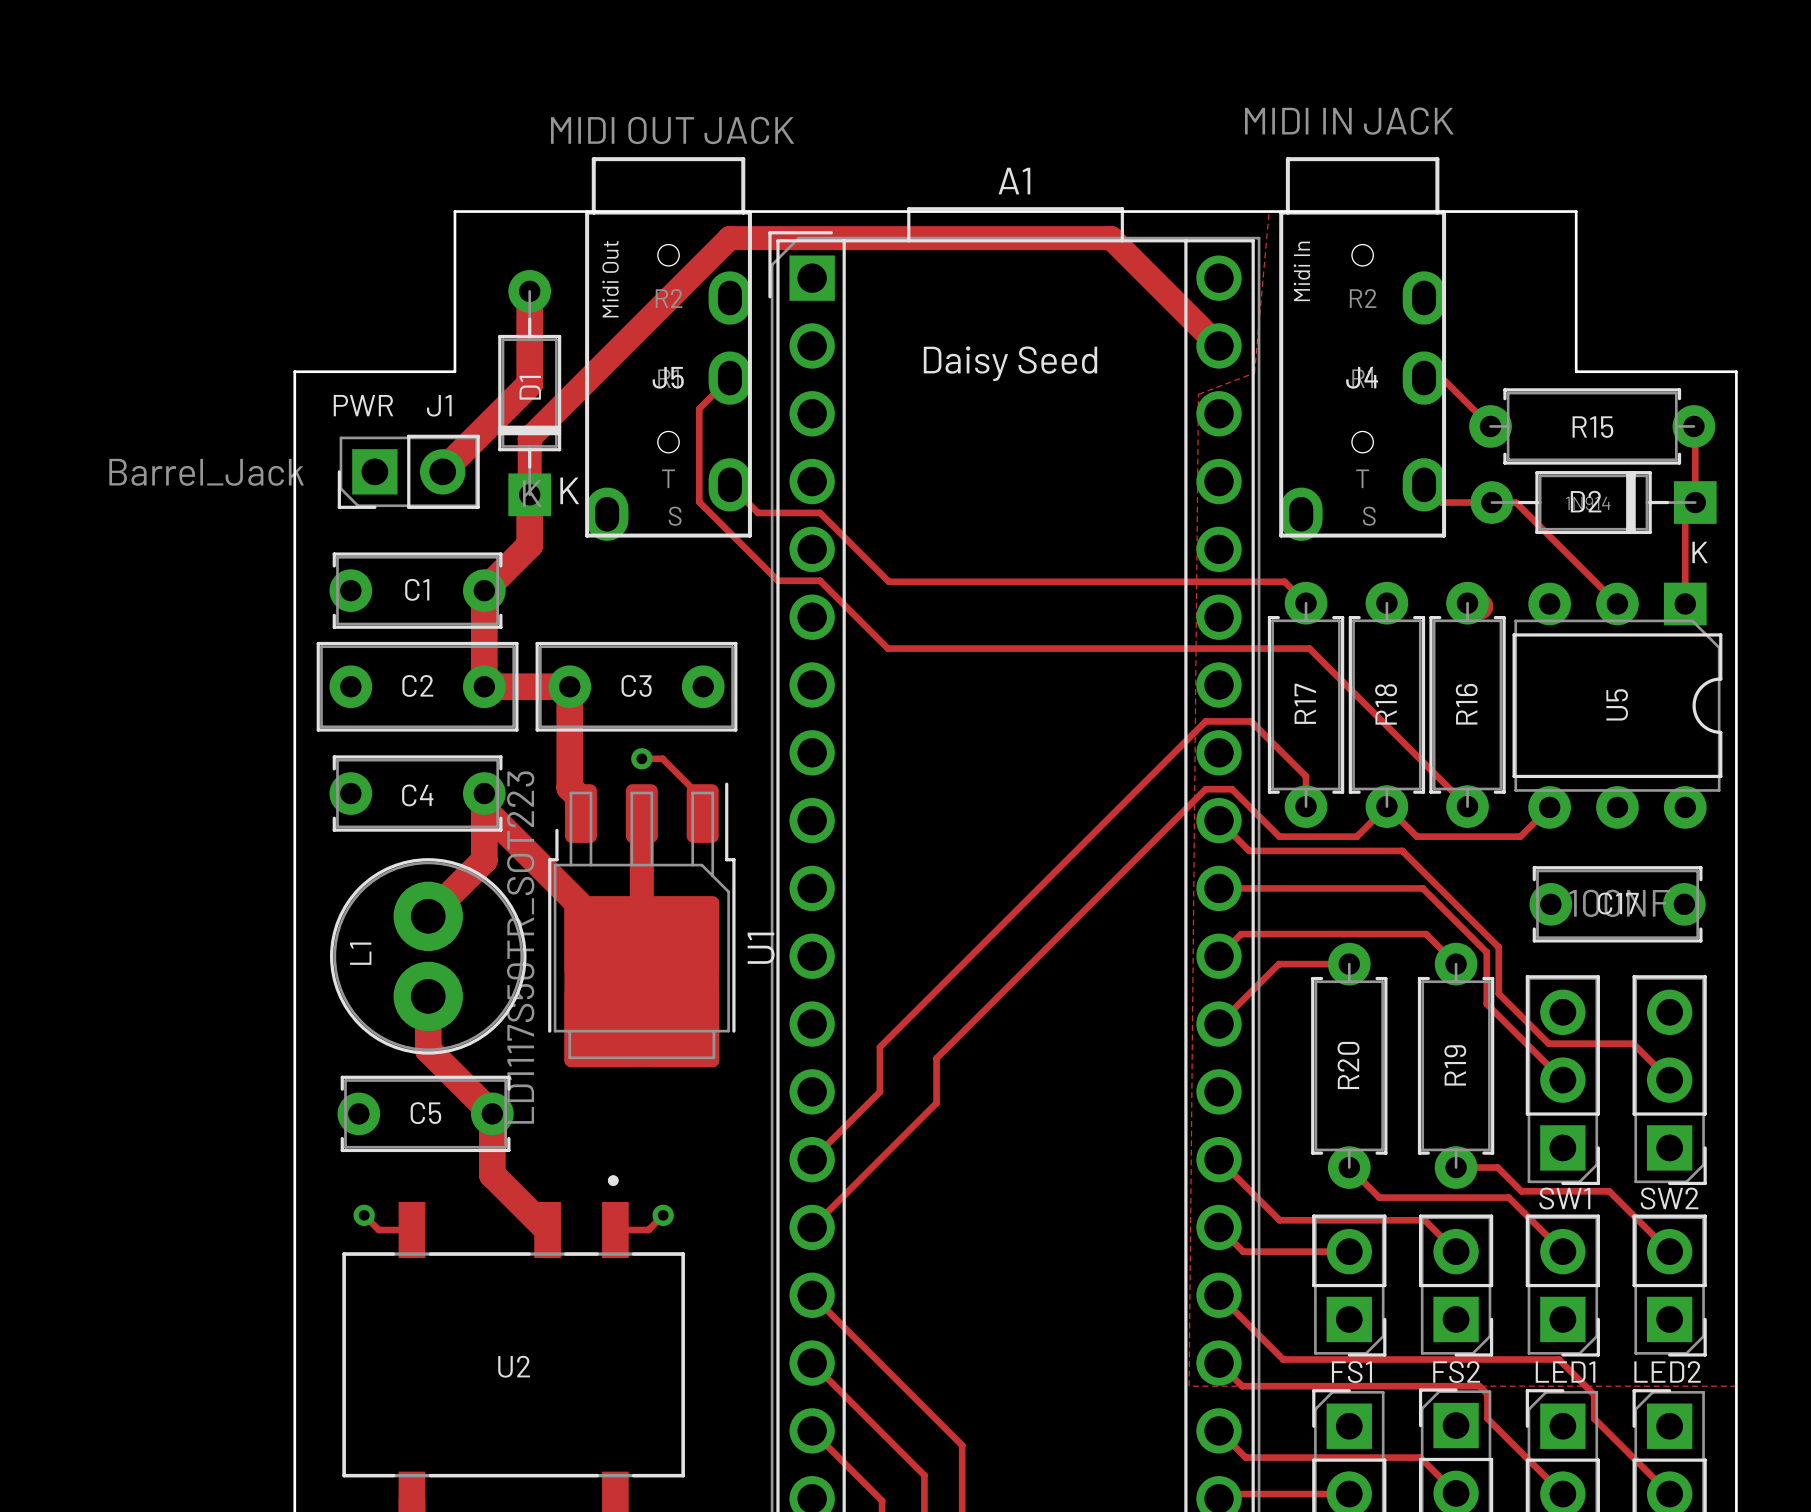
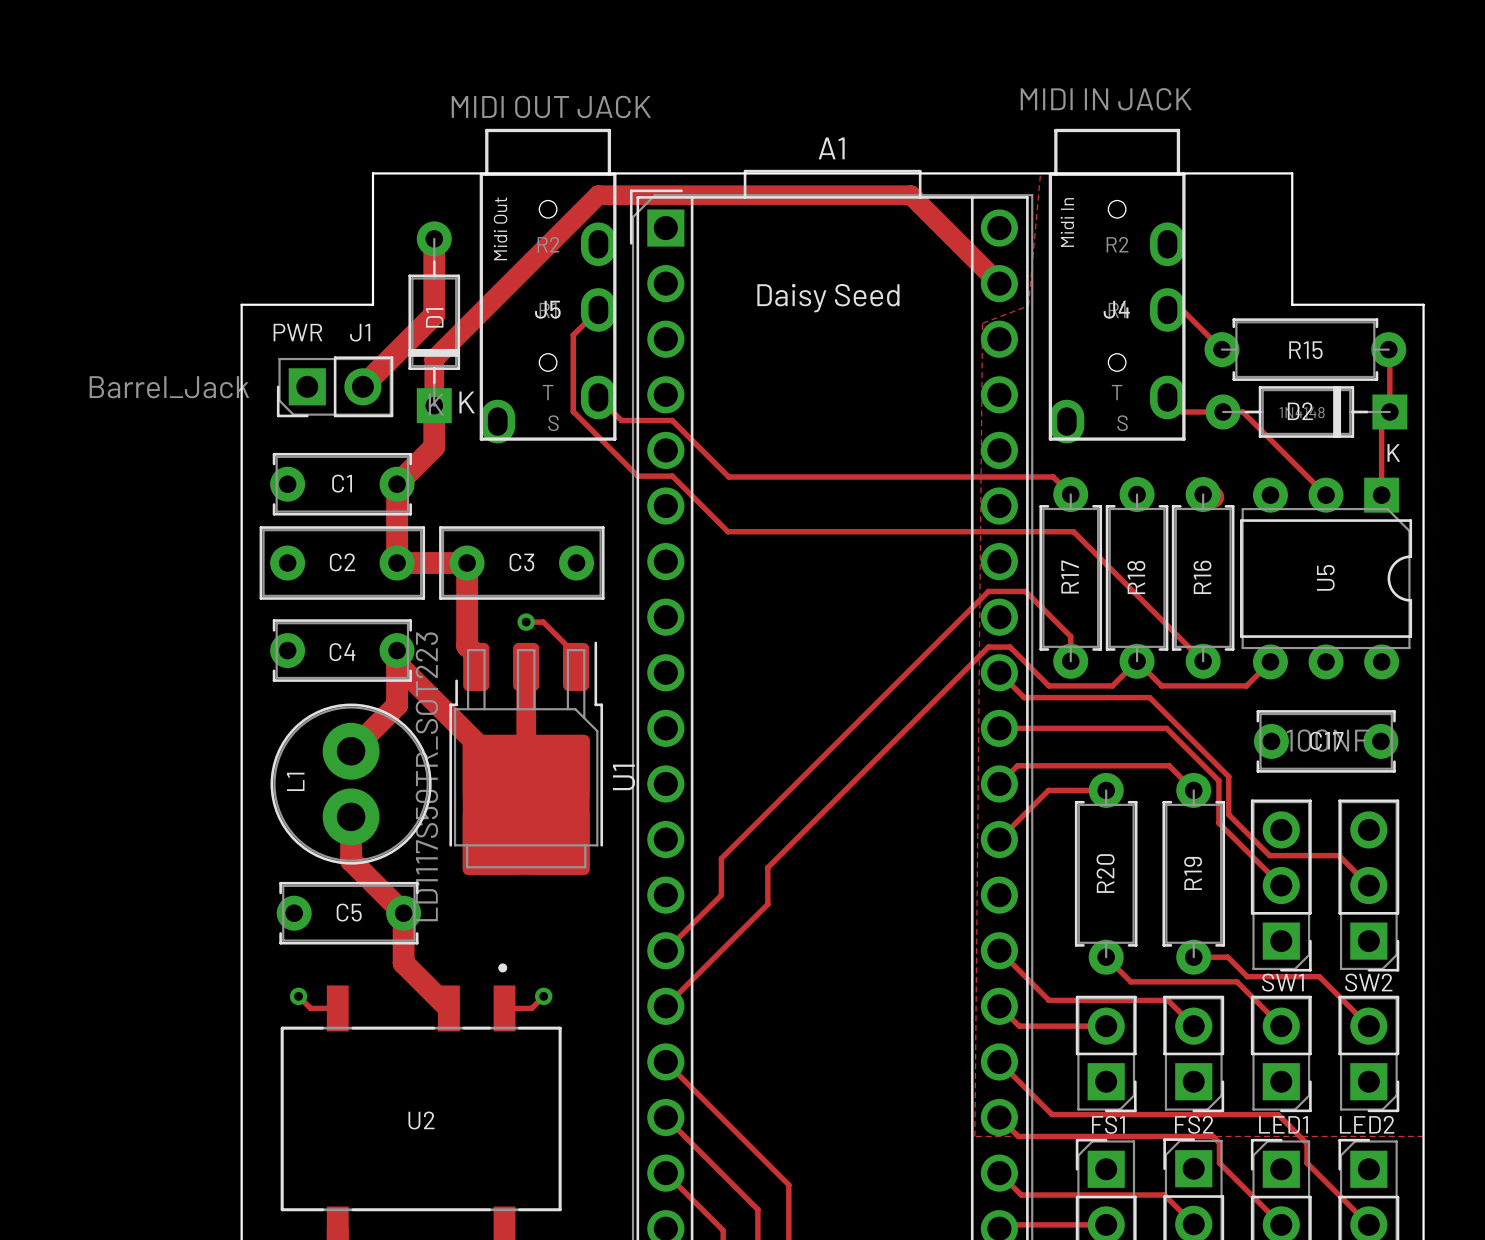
D2 value: 1N914 (1588, 503) -> 1N4148 (1302, 412)

